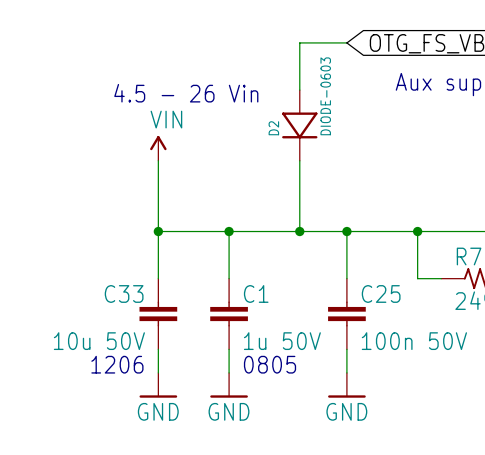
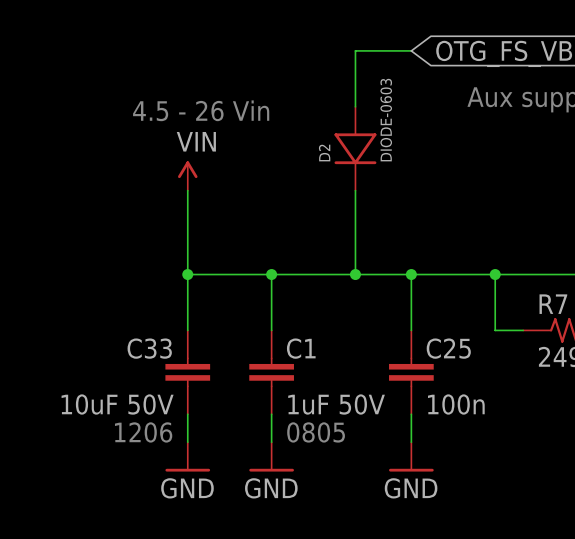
C33 value: 10u 50V (99, 341) -> 10uF 50V (117, 404)
C1 value: 1u 50V (282, 341) -> 1uF 50V (336, 404)
C25 value: 100n 50V (414, 341) -> 100n (456, 404)

